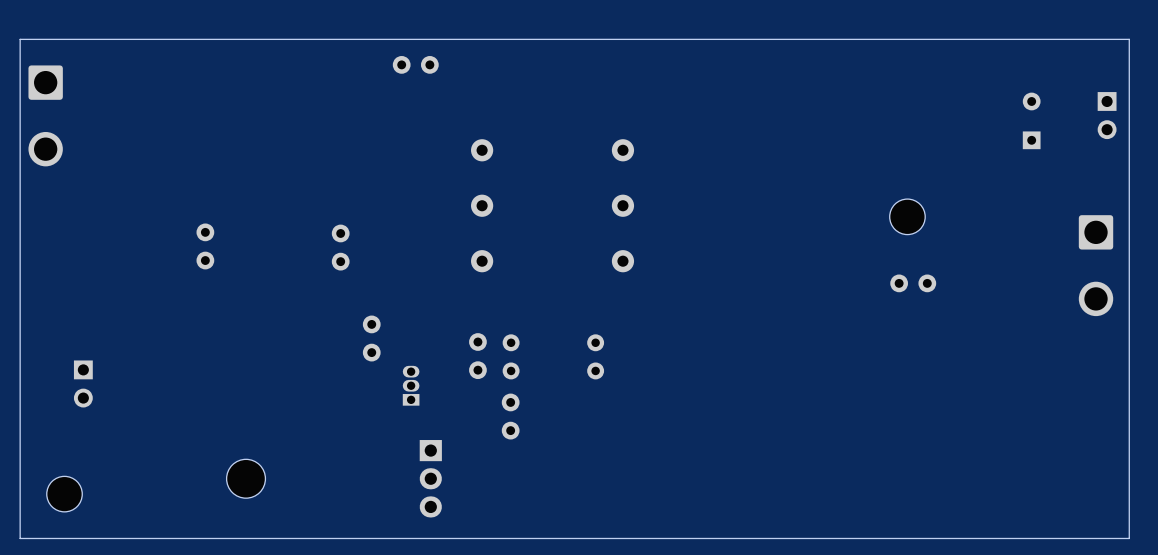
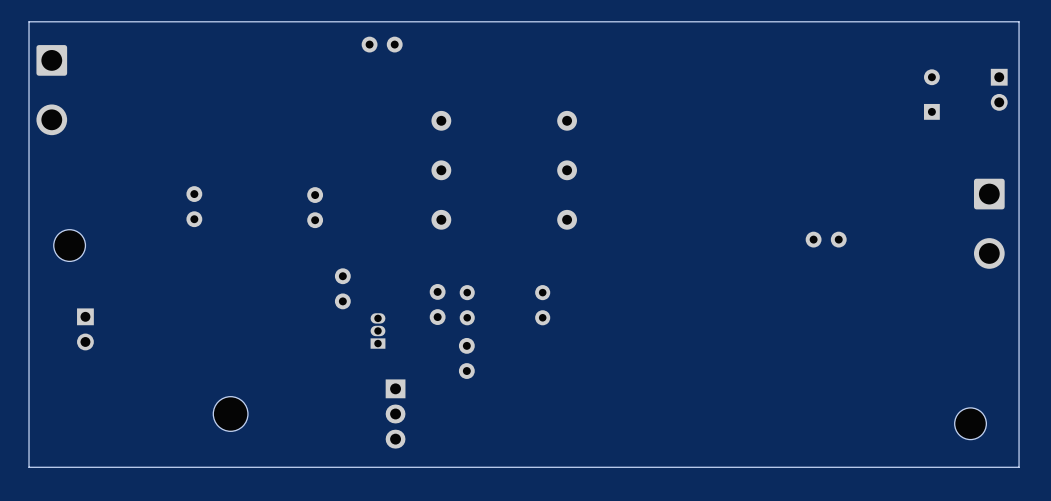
part: (907, 216) -> none
part: none -> (970, 423)
part position: (64, 494) -> (69, 245)

